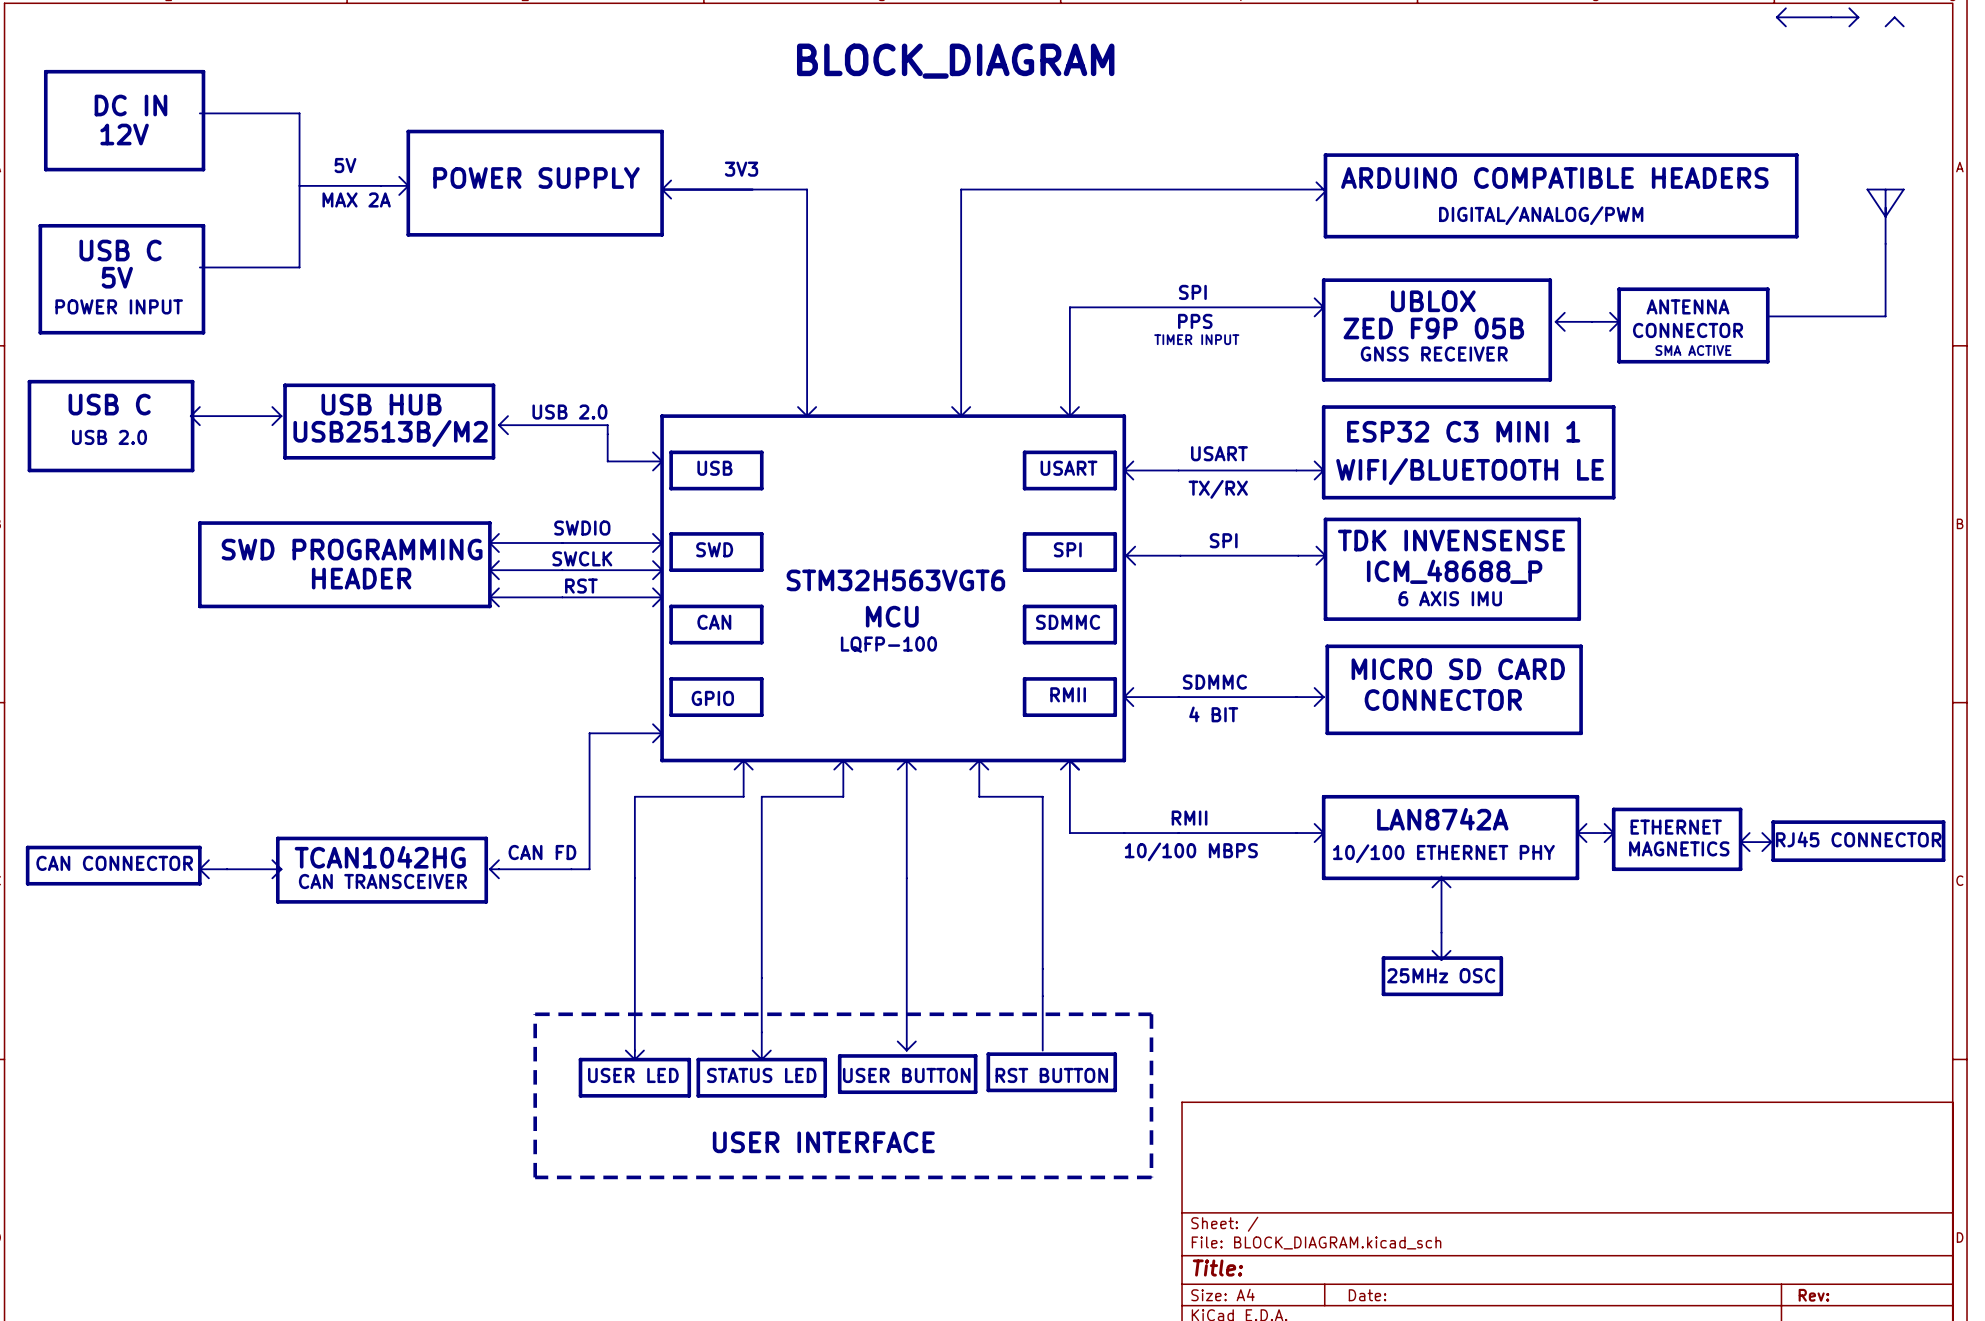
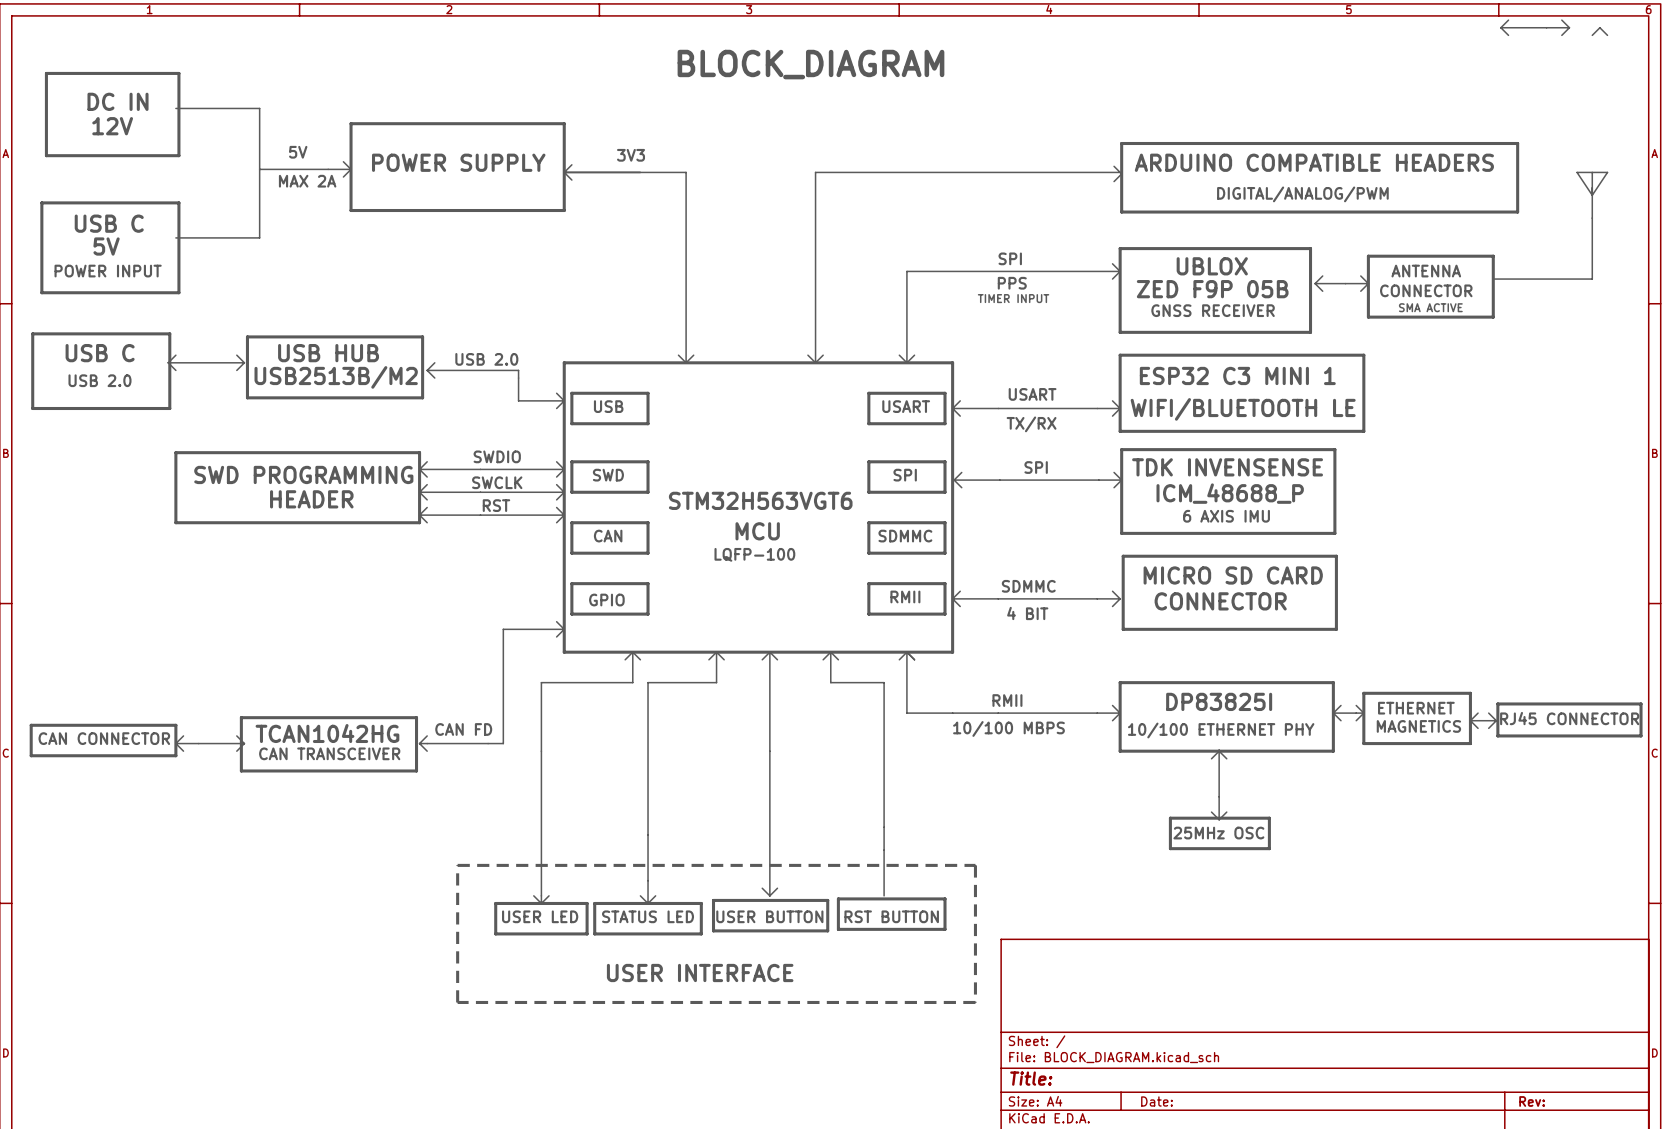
text: LAN8742A (1442, 819) -> DP83825I (1219, 701)

